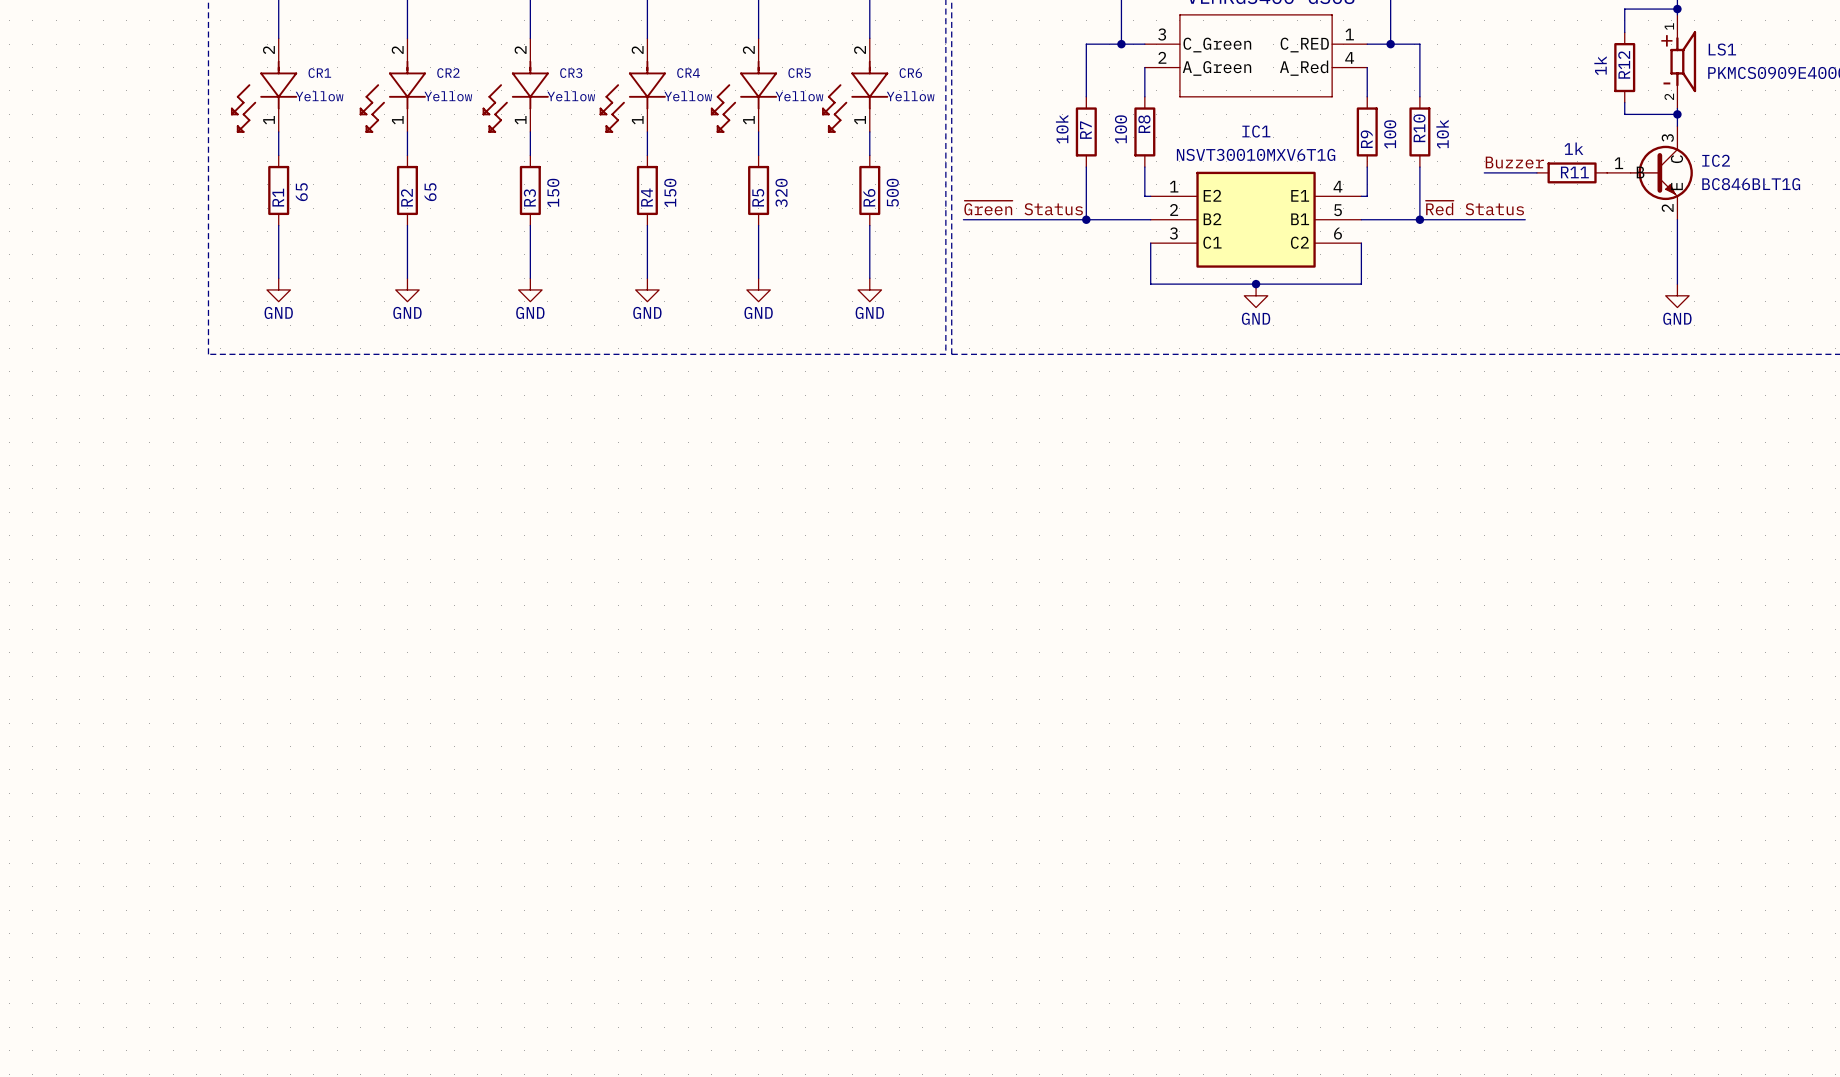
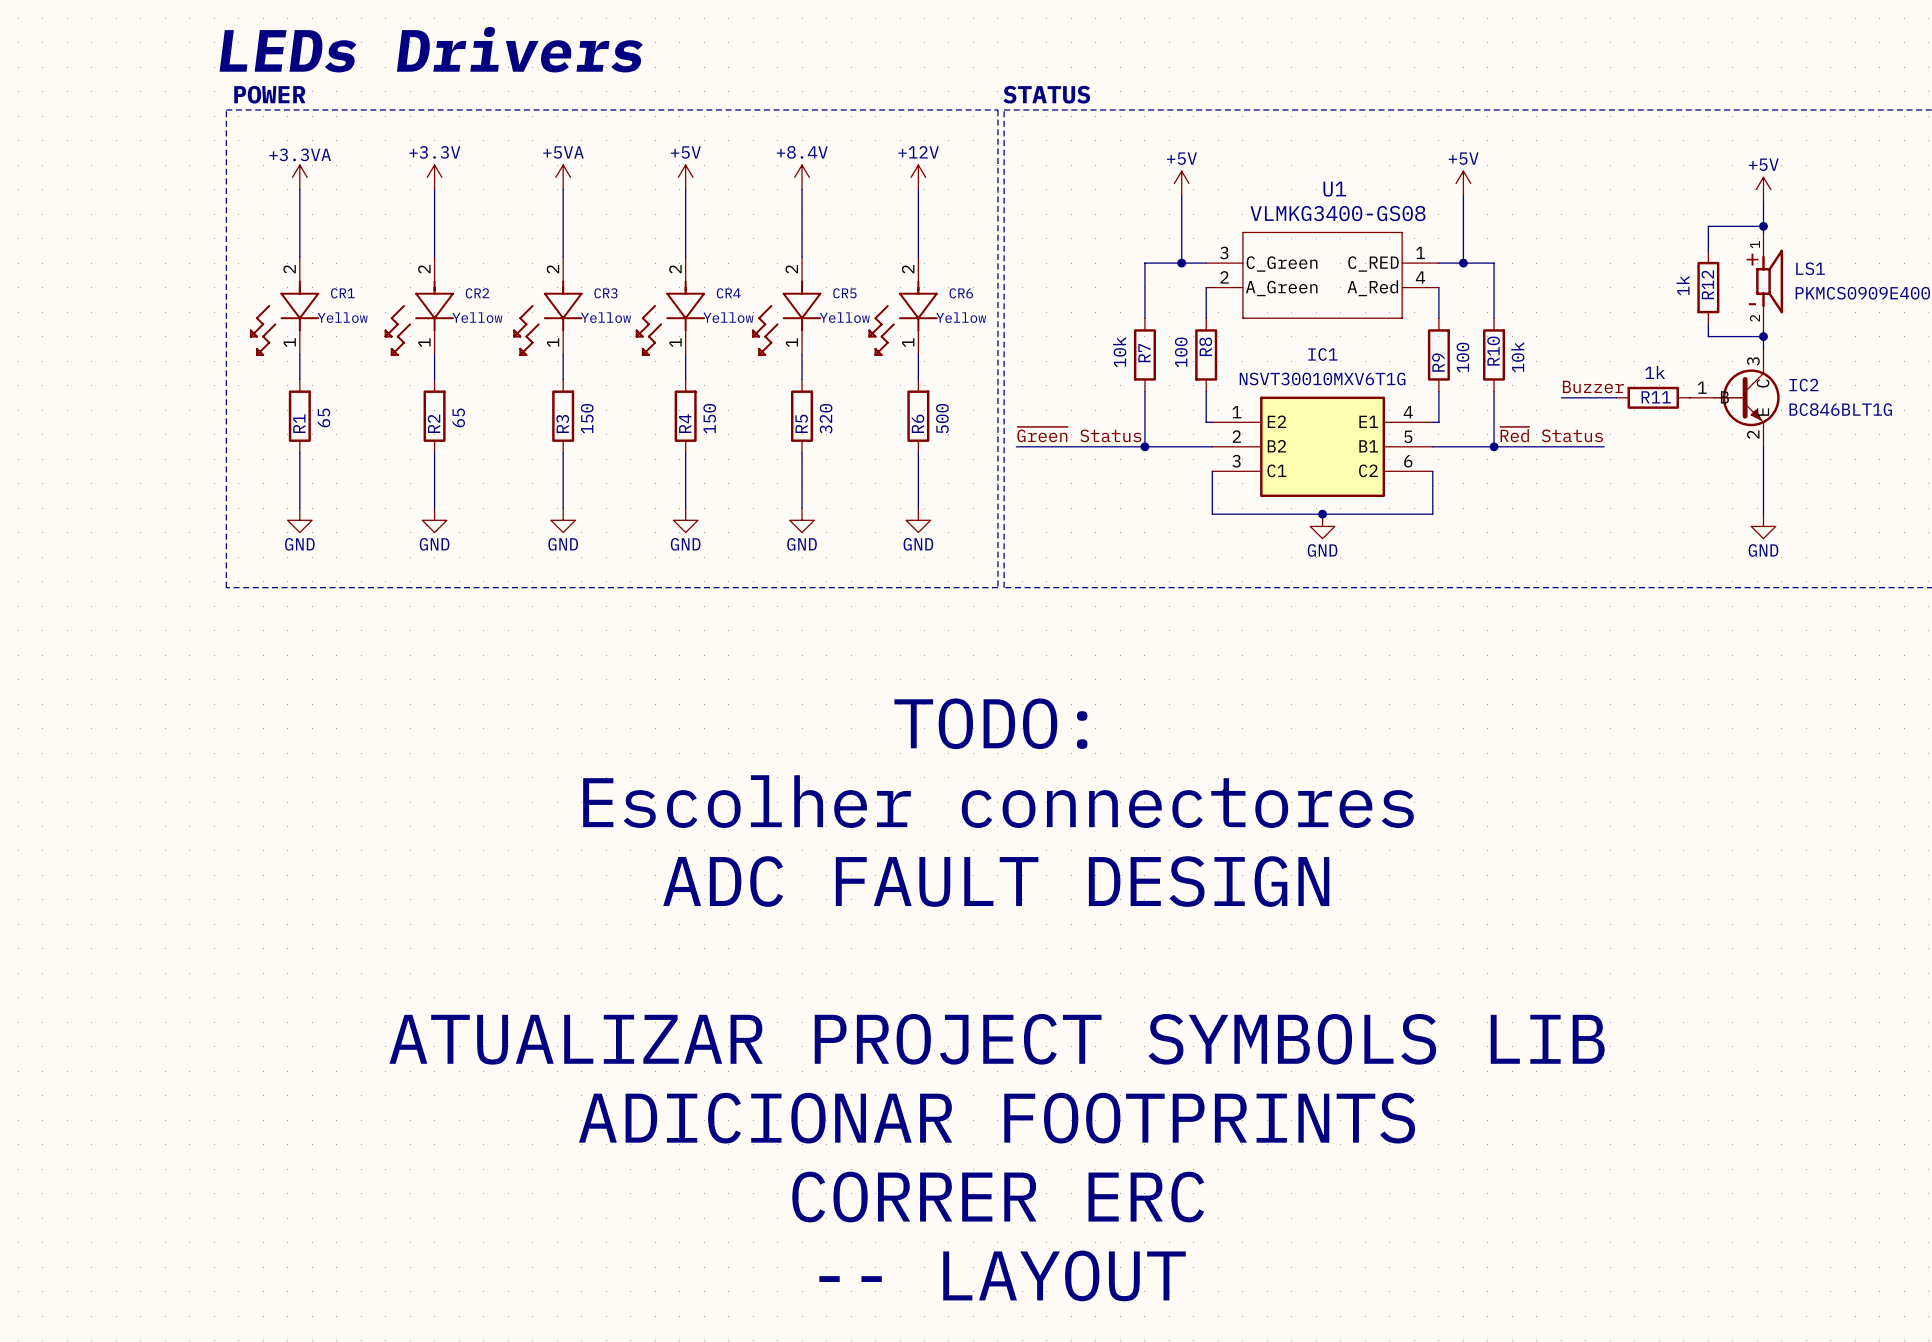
text: none -> TODO: (990, 723)
text: none -> Escolher connectores (998, 801)
text: none -> ADC FAULT DESIGN (996, 881)
text: none -> ATUALIZAR PROJECT SYMBOLS LIB (997, 1039)
text: none -> ADICIONAR FOOTPRINTS (997, 1118)
text: none -> CORRER ERC (998, 1197)
text: none -> -- LAYOUT (1002, 1275)

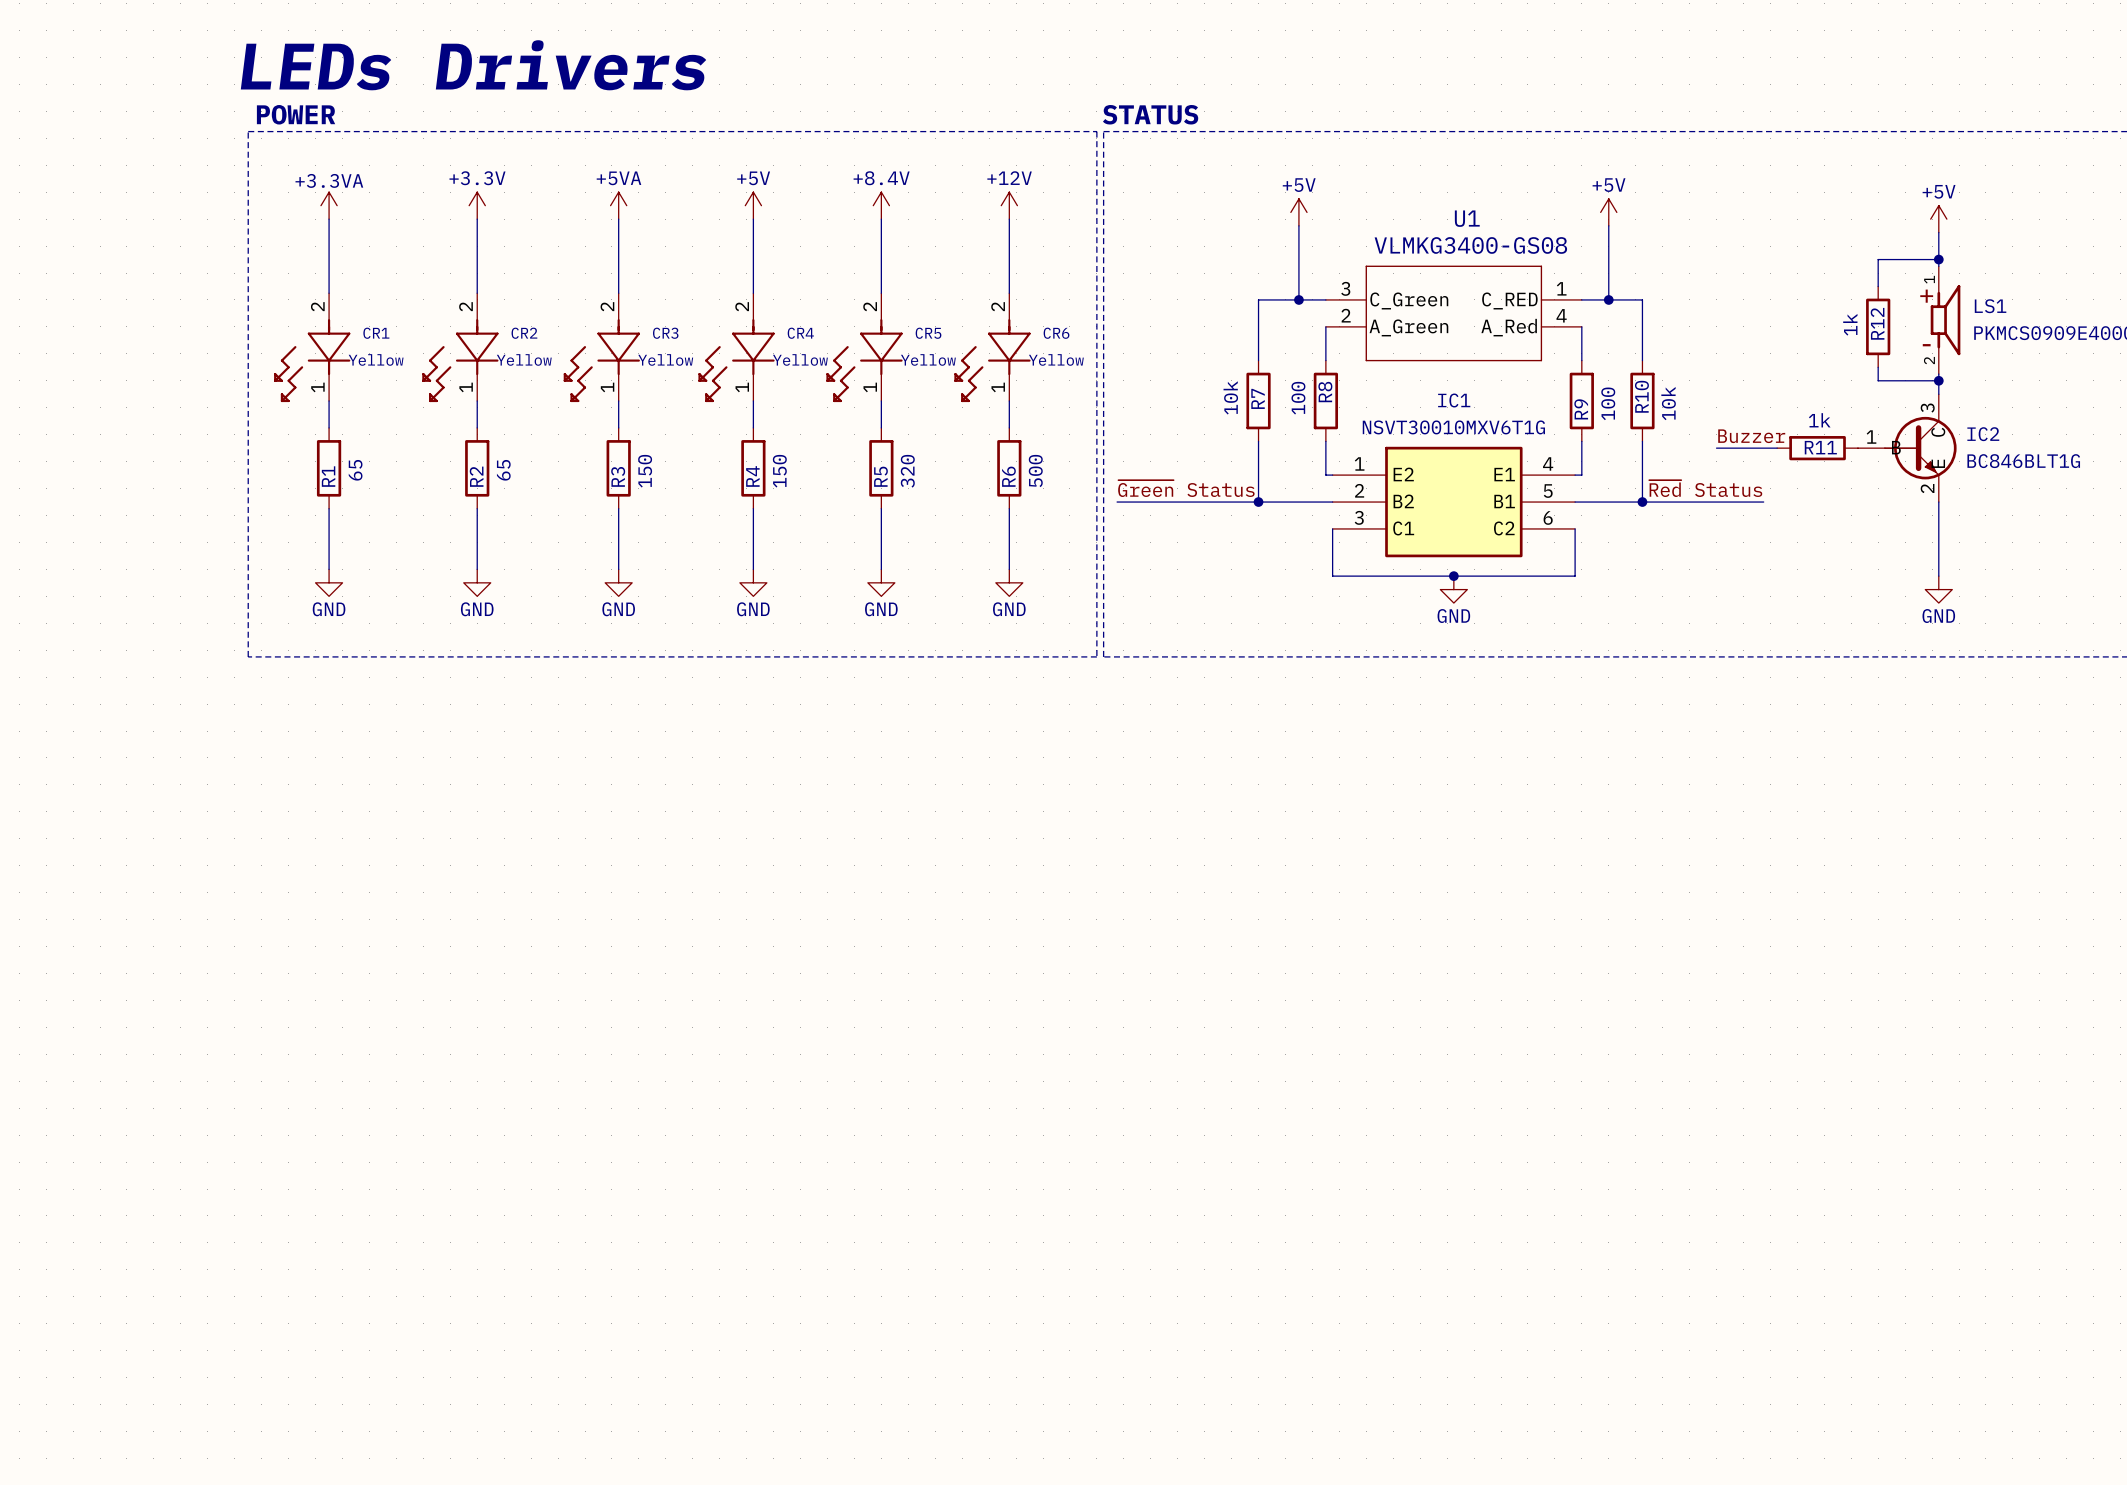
text: TODO: (990, 723) -> none
text: Escolher connectores (998, 801) -> none
text: ADC FAULT DESIGN (996, 881) -> none
text: ATUALIZAR PROJECT SYMBOLS LIB (997, 1039) -> none
text: ADICIONAR FOOTPRINTS (997, 1118) -> none
text: CORRER ERC (998, 1197) -> none
text: -- LAYOUT (1002, 1275) -> none

